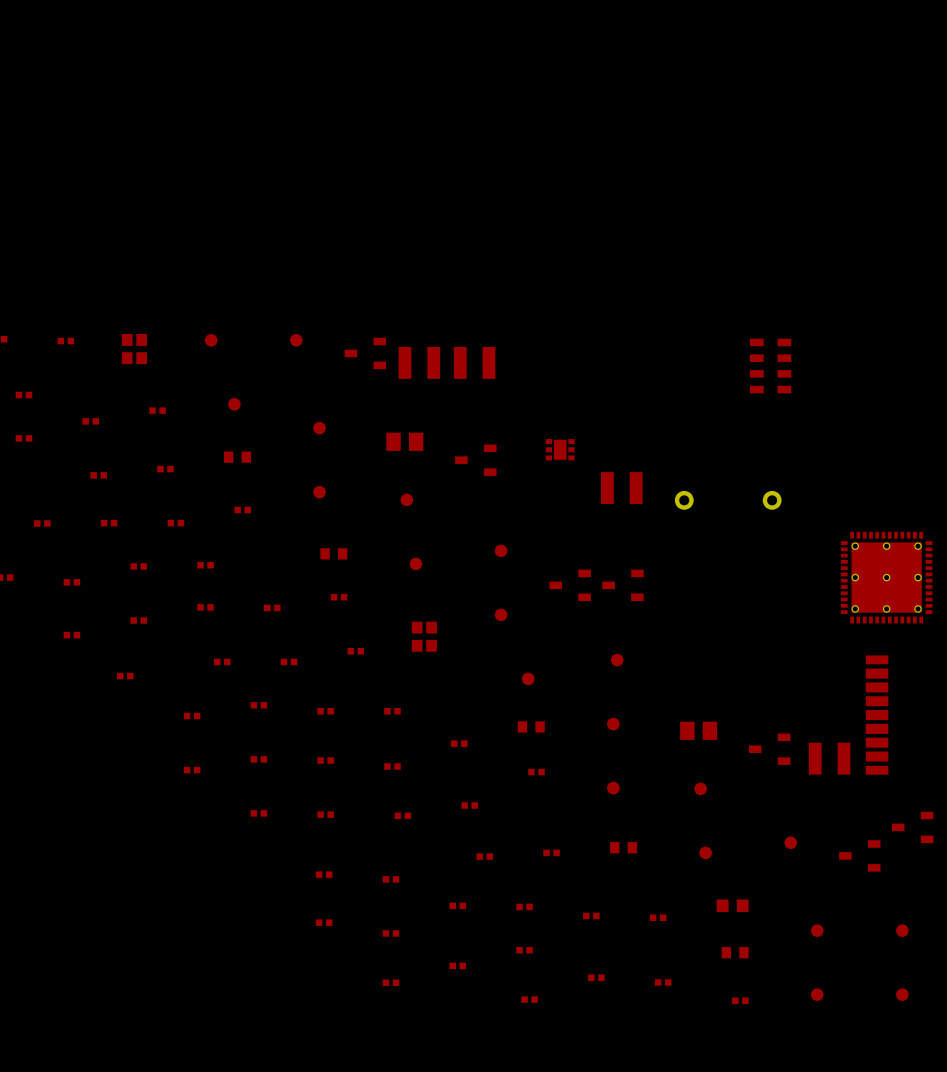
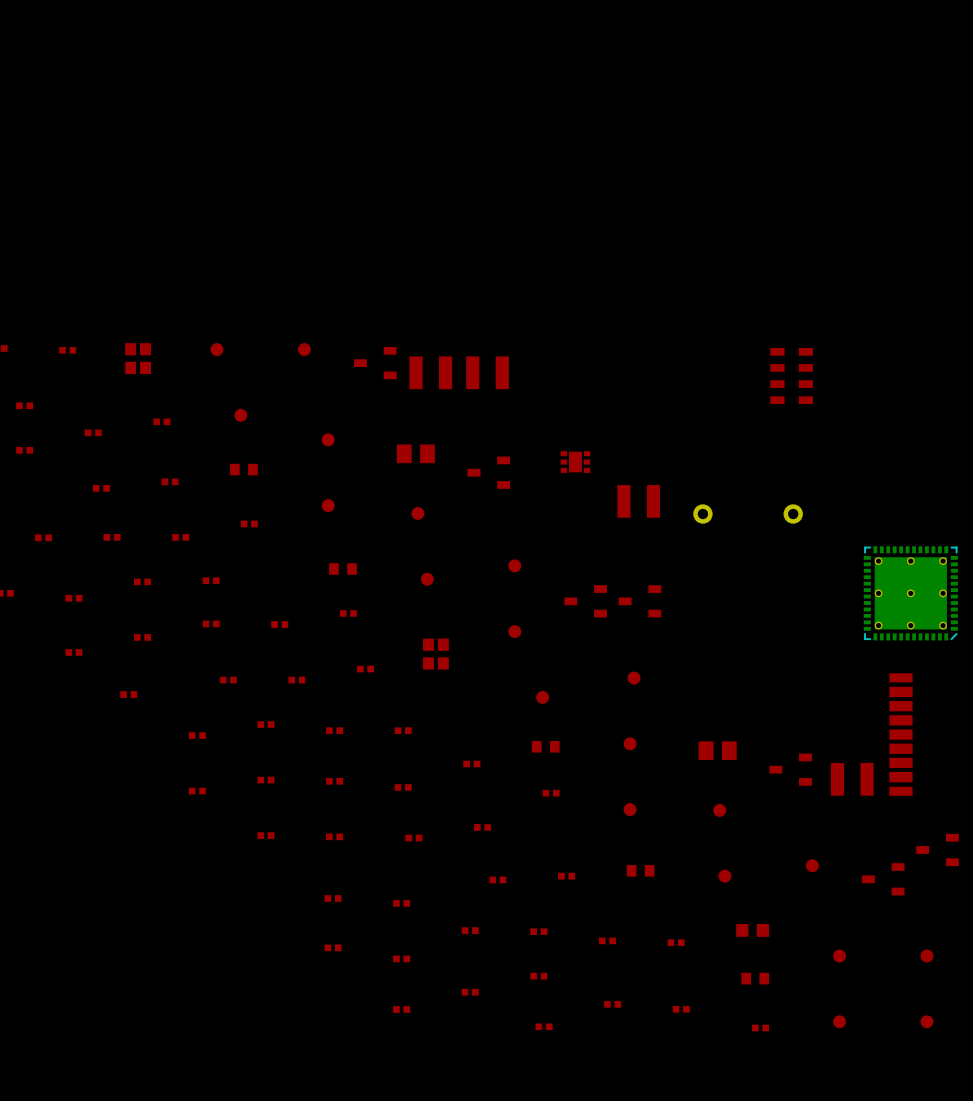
part side: top (886, 577) -> bottom (910, 593)

